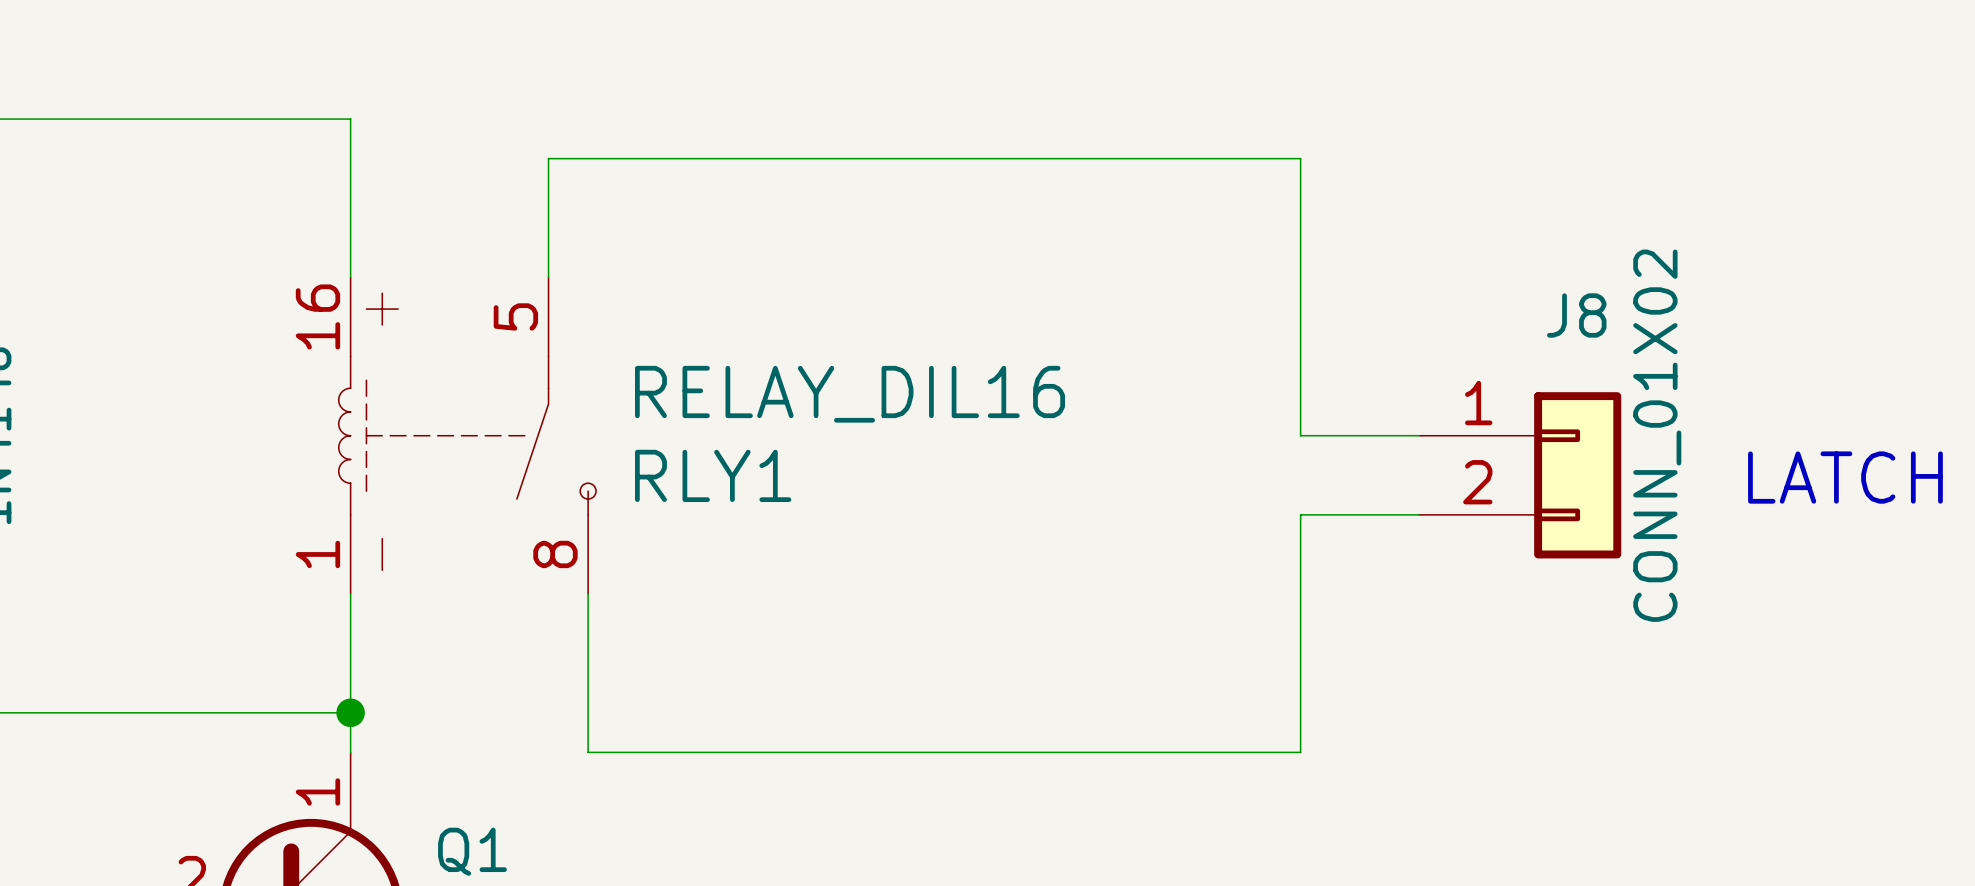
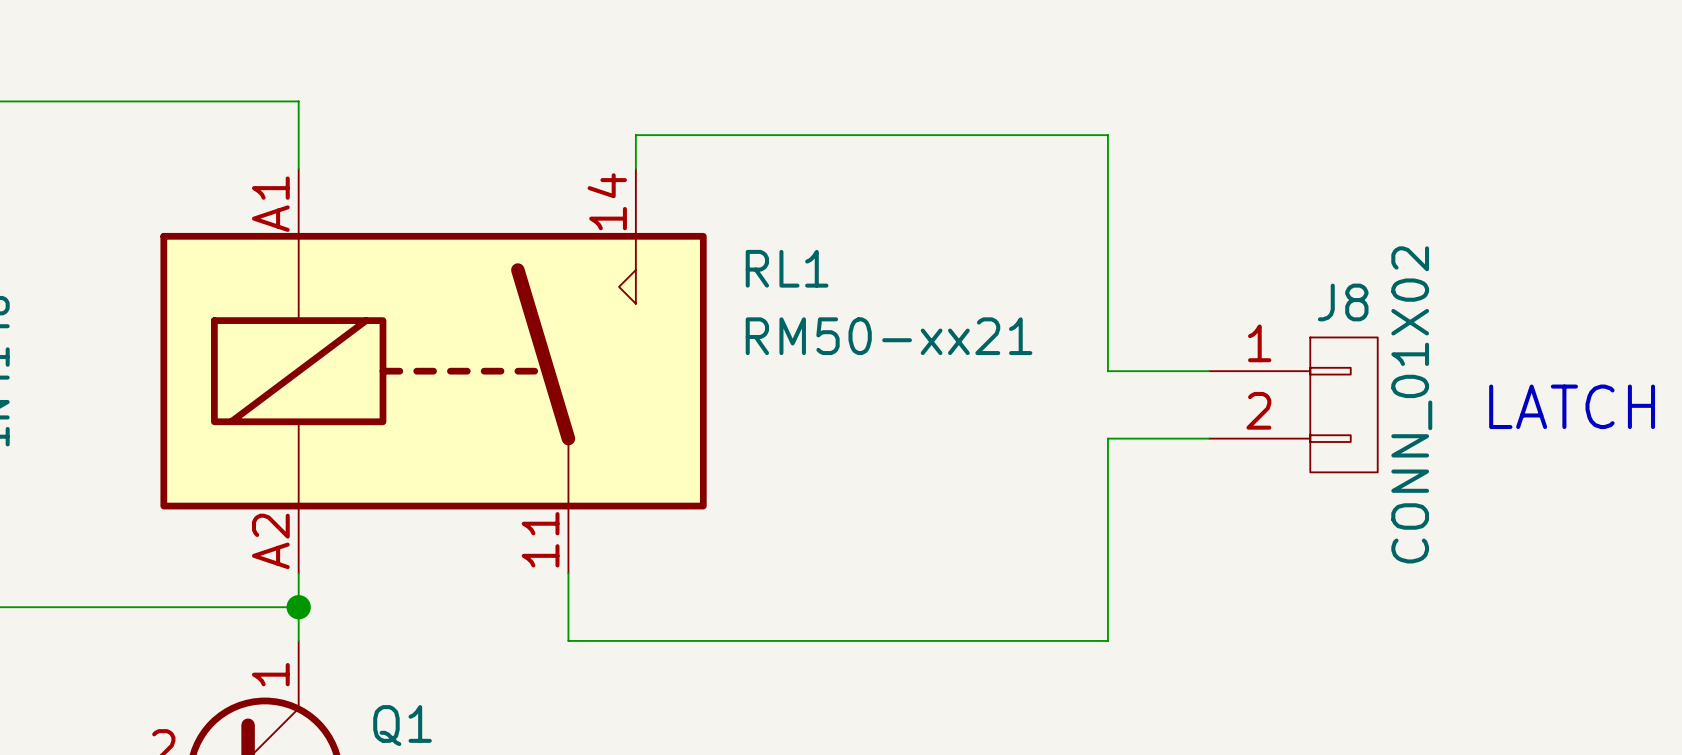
wire: (746, 158) (548, 158) (548, 277) -> (635, 135) (635, 168)
J8 symbol: [1419, 392, 1622, 559] -> [1209, 337, 1378, 473]
RLY1: RELAY_DIL16 (467, 435) -> none
RL1: none -> RM50-xx21 (433, 371)
wire: (588, 594) (588, 752) (667, 752) -> (568, 573) (568, 640)

